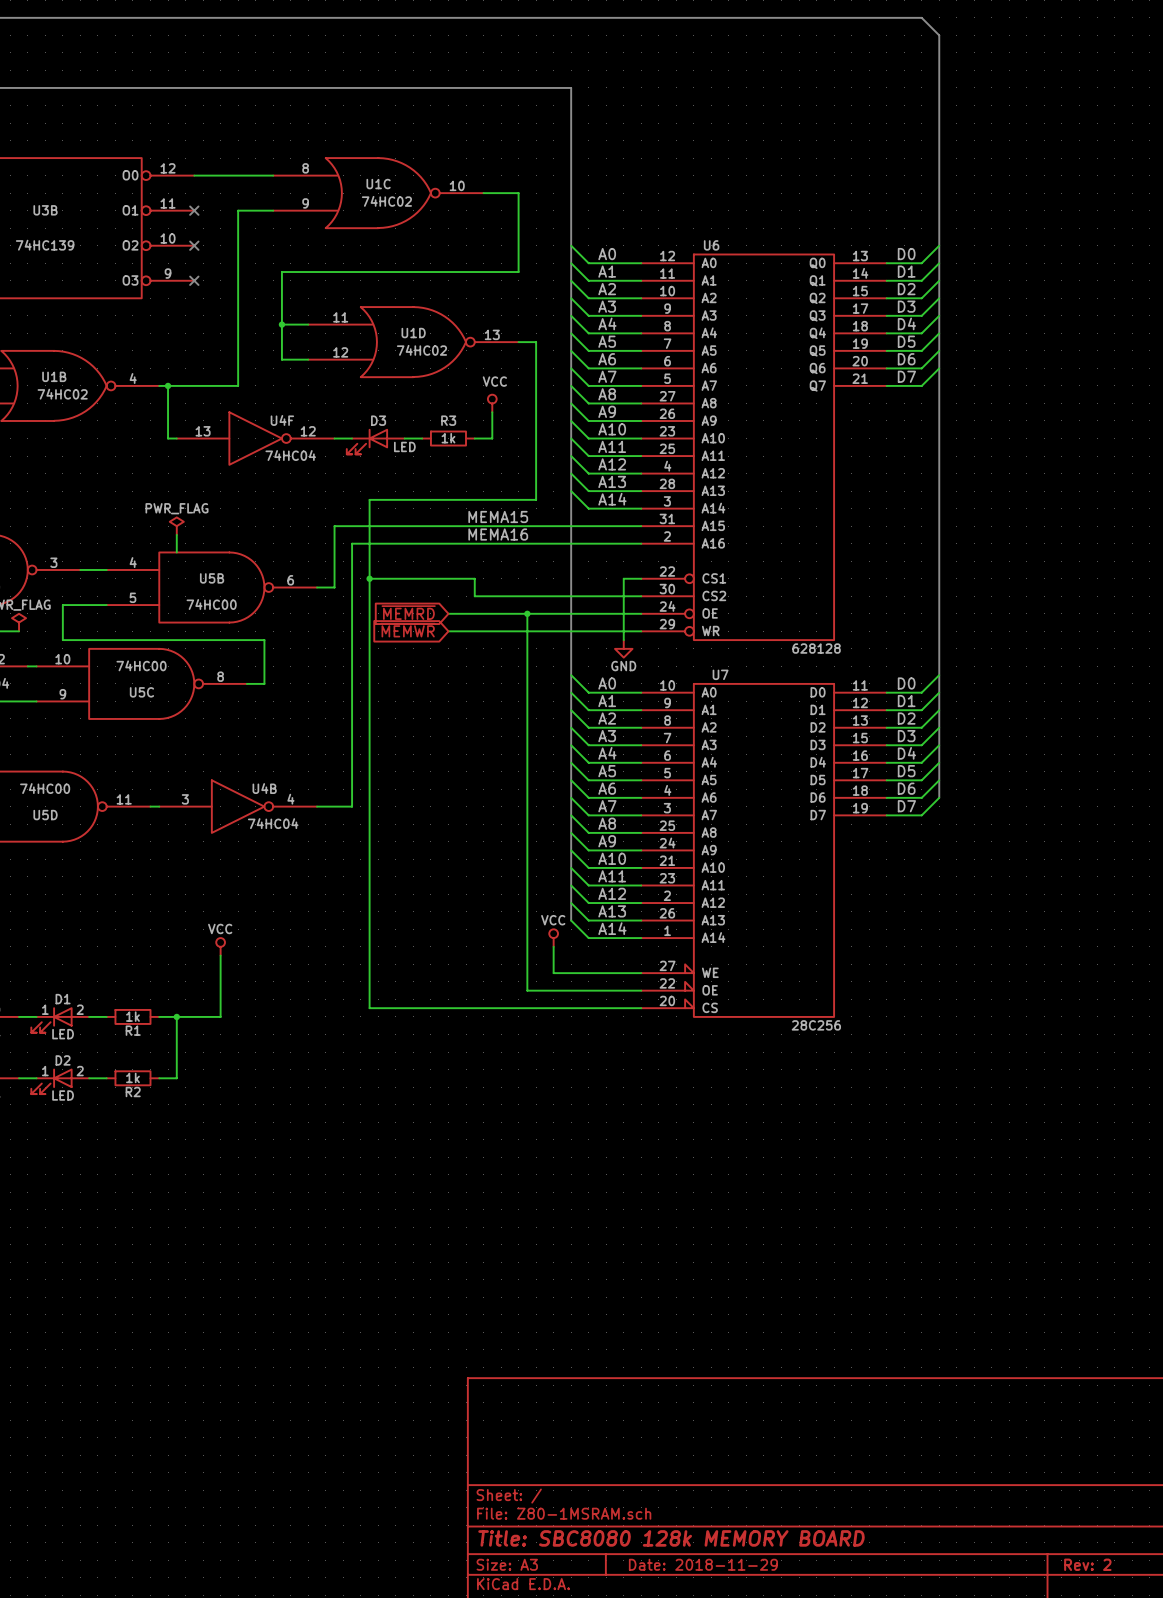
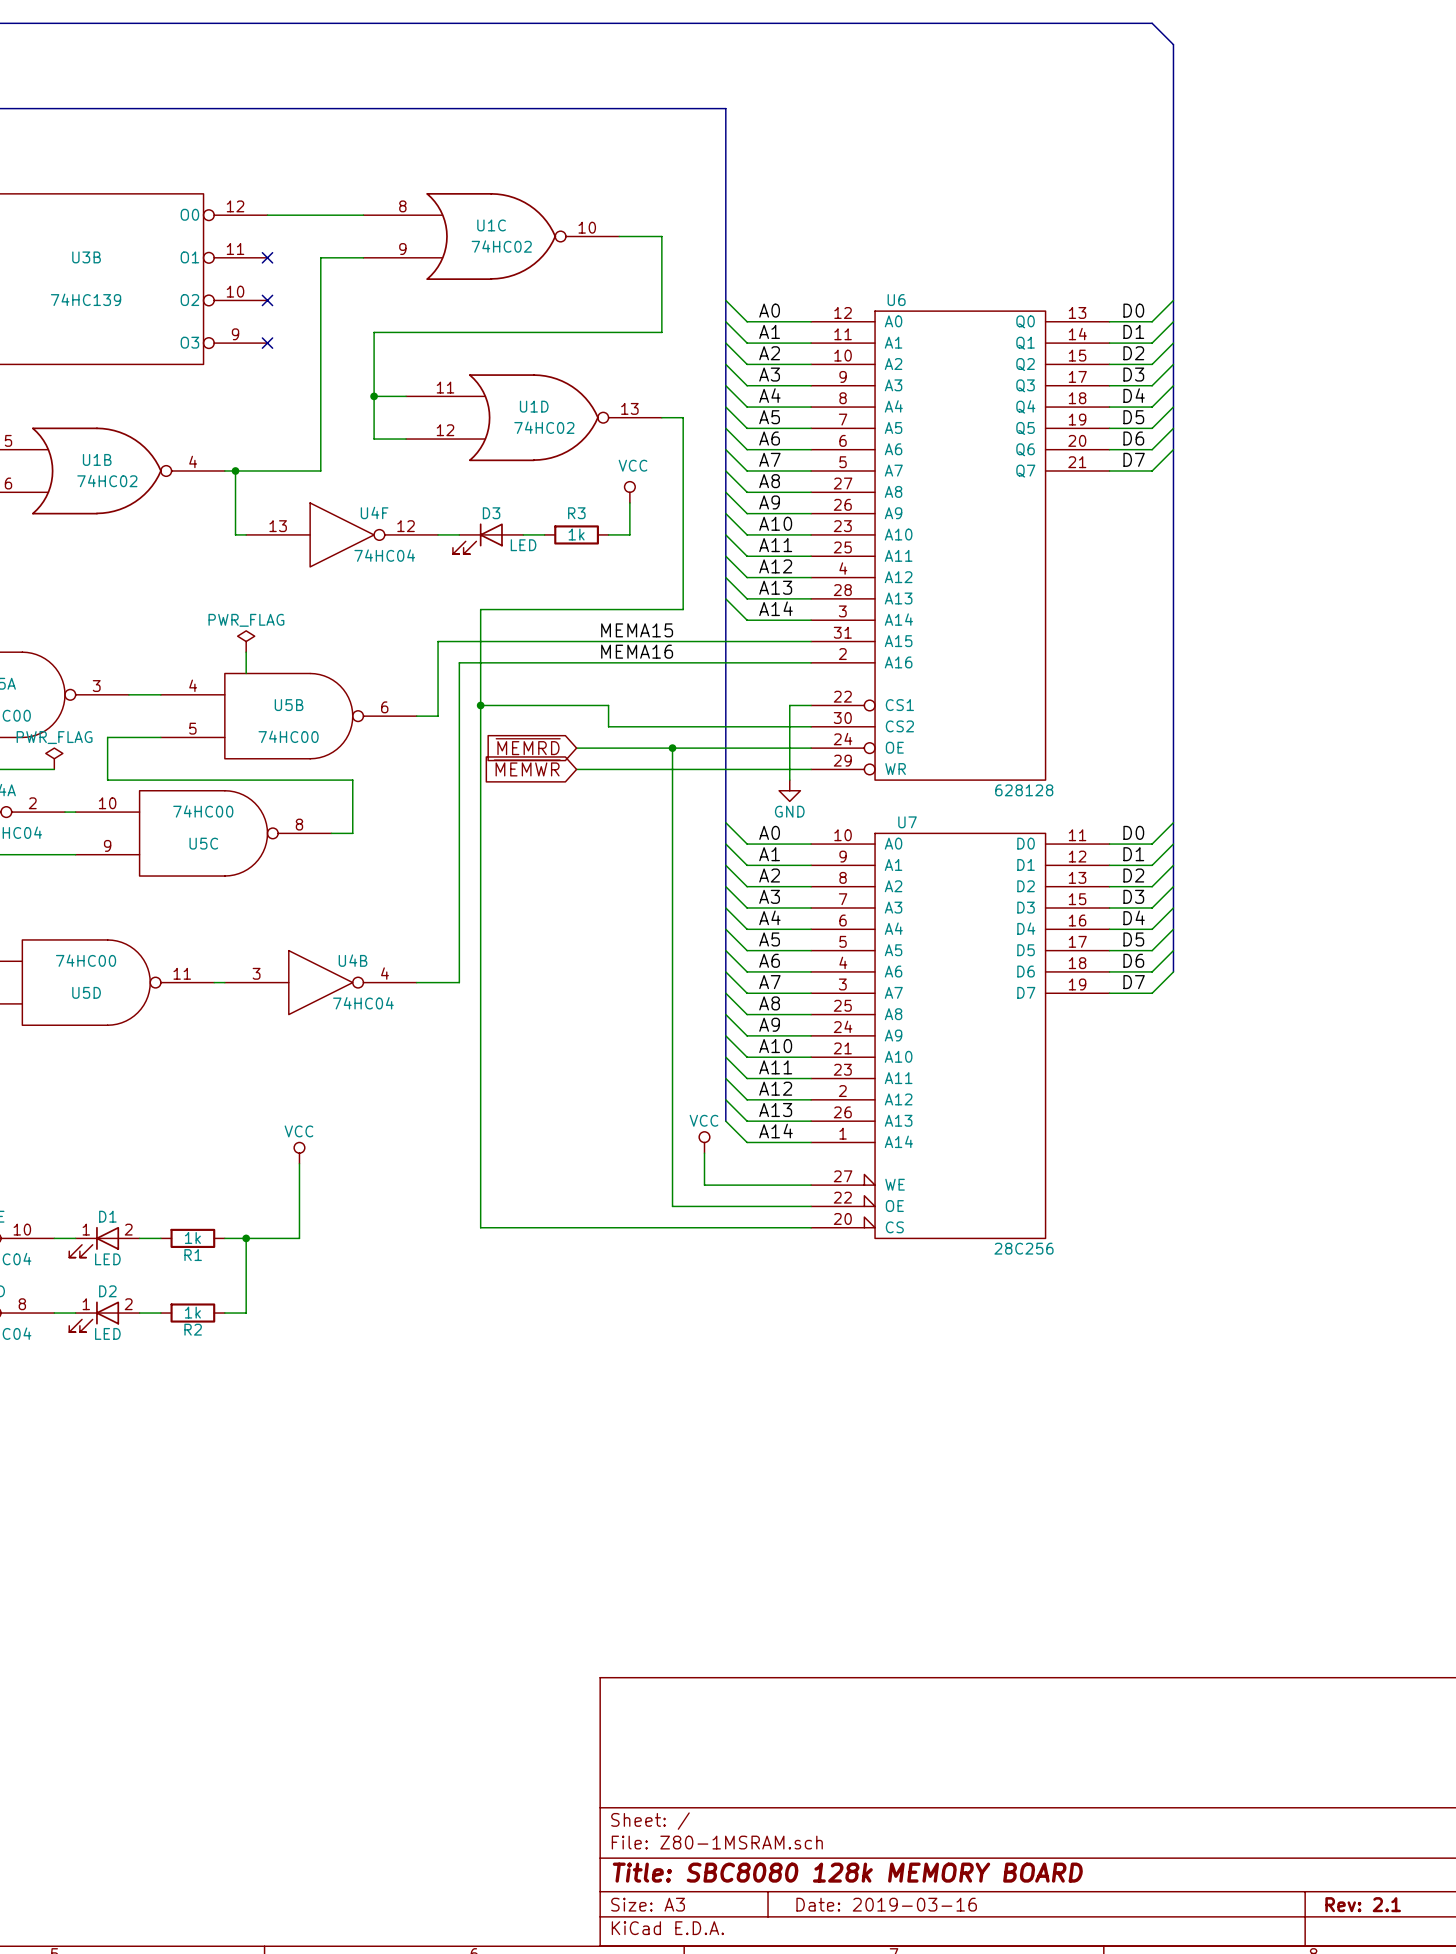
title block: Date: 2018-11-29 (703, 1564) -> Date: 2019-03-16 (886, 1904)
title block: Rev: 2 (1087, 1564) -> Rev: 2.1 (1363, 1904)

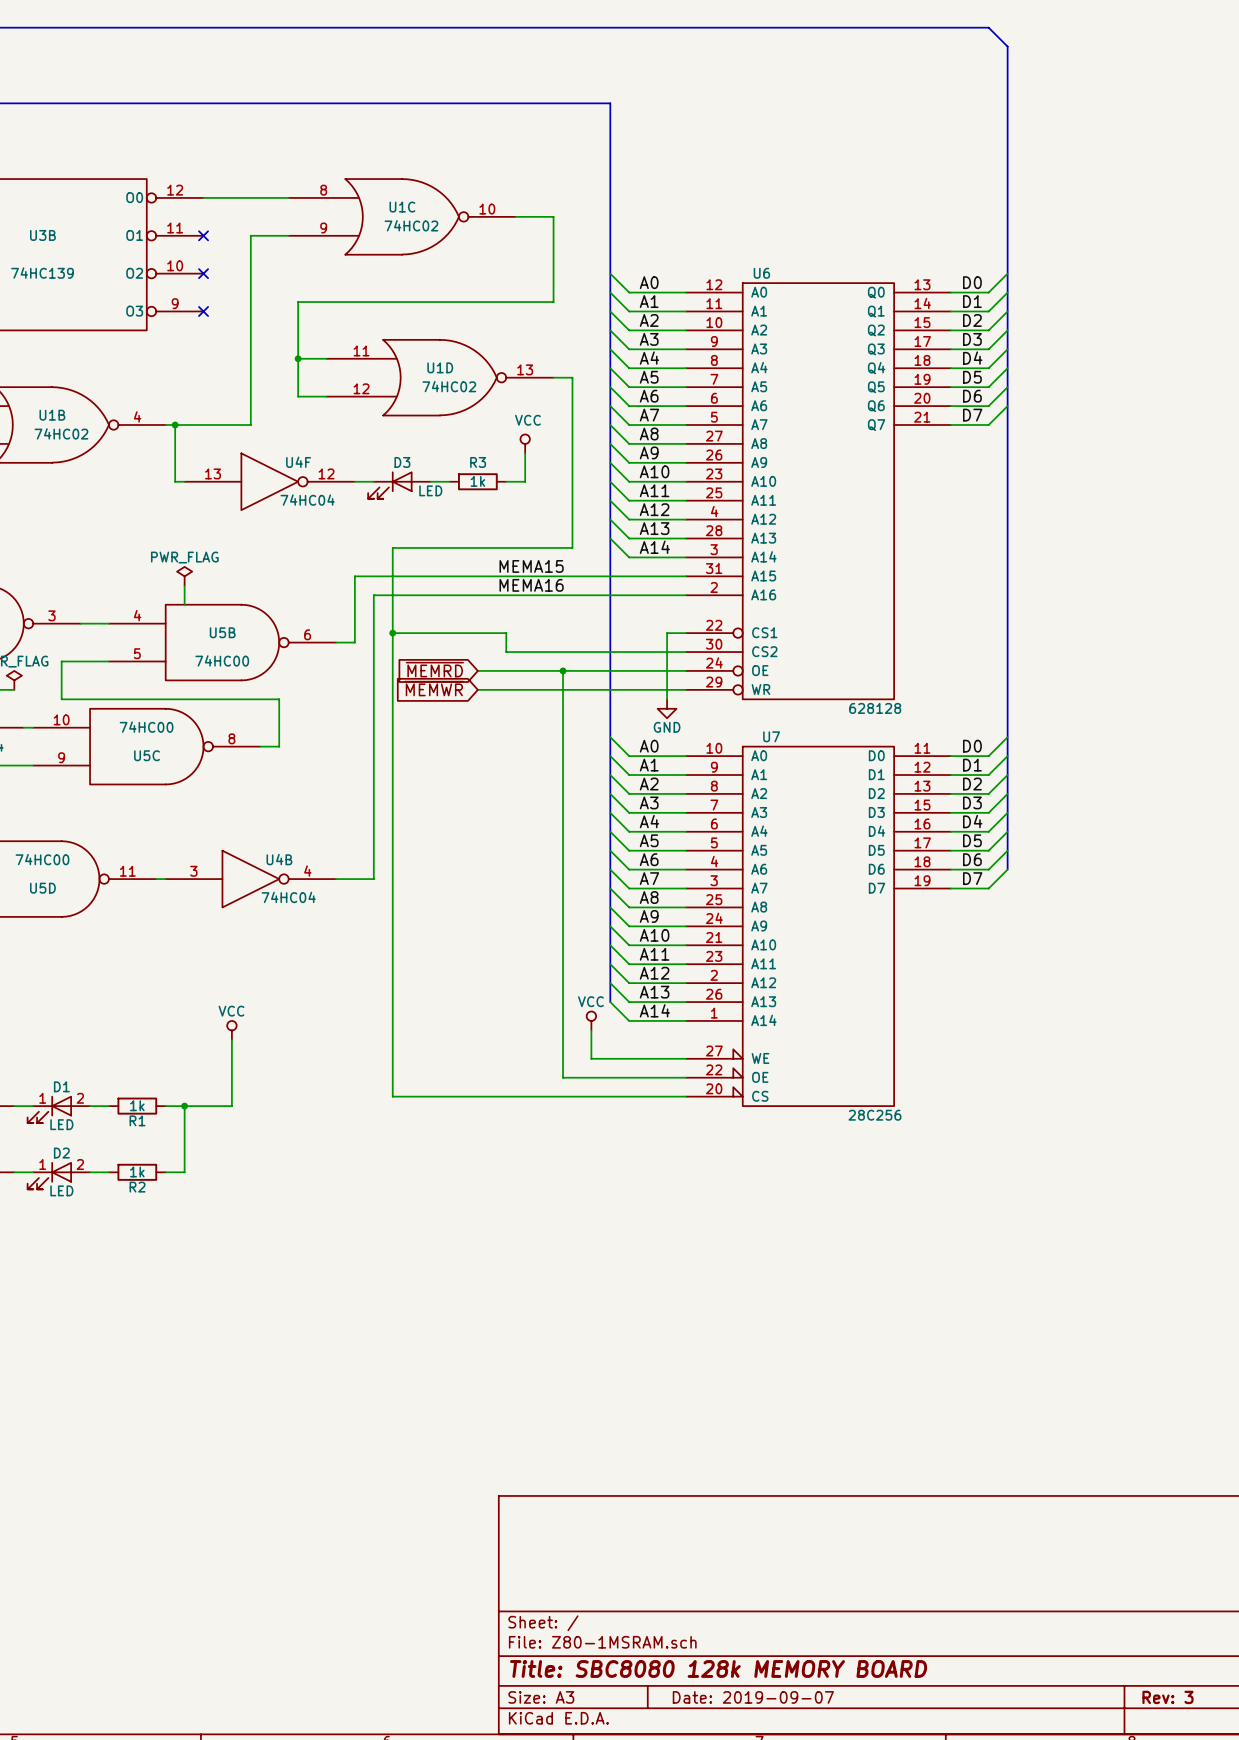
title block: Date: 2019-03-16 (886, 1904) -> Date: 2019-09-07 (753, 1697)
title block: Rev: 2.1 (1363, 1904) -> Rev: 3 (1167, 1697)

